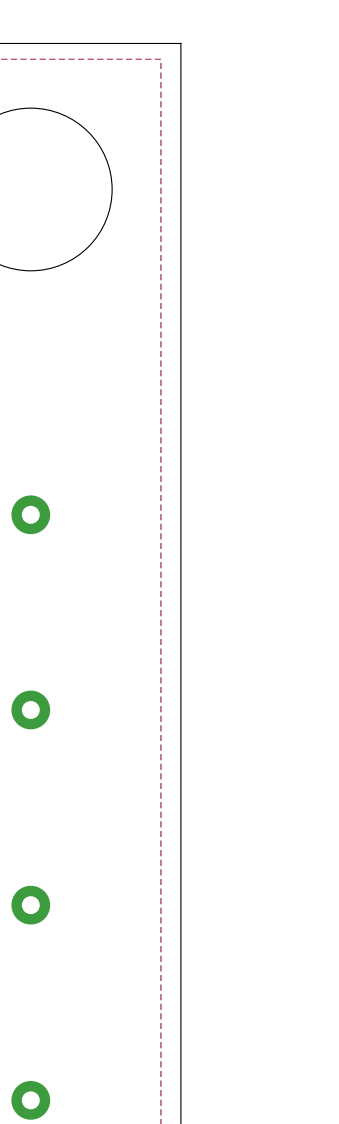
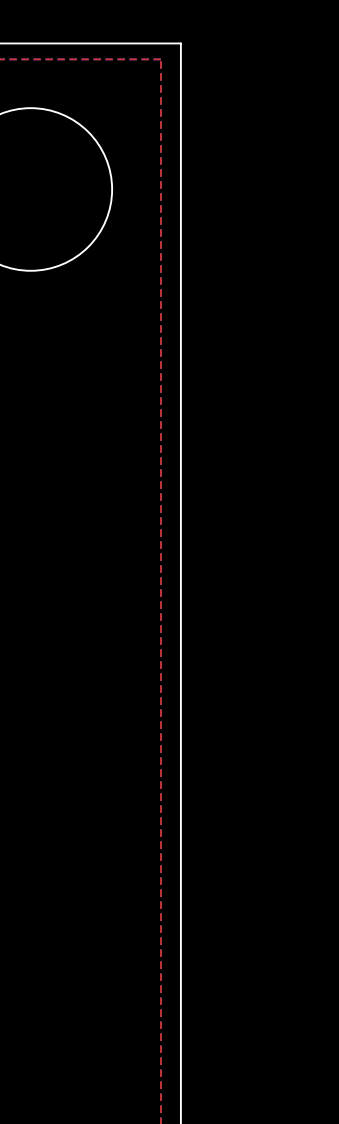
via: (30, 514) -> none
via: (30, 709) -> none
via: (30, 905) -> none
via: (30, 1100) -> none

